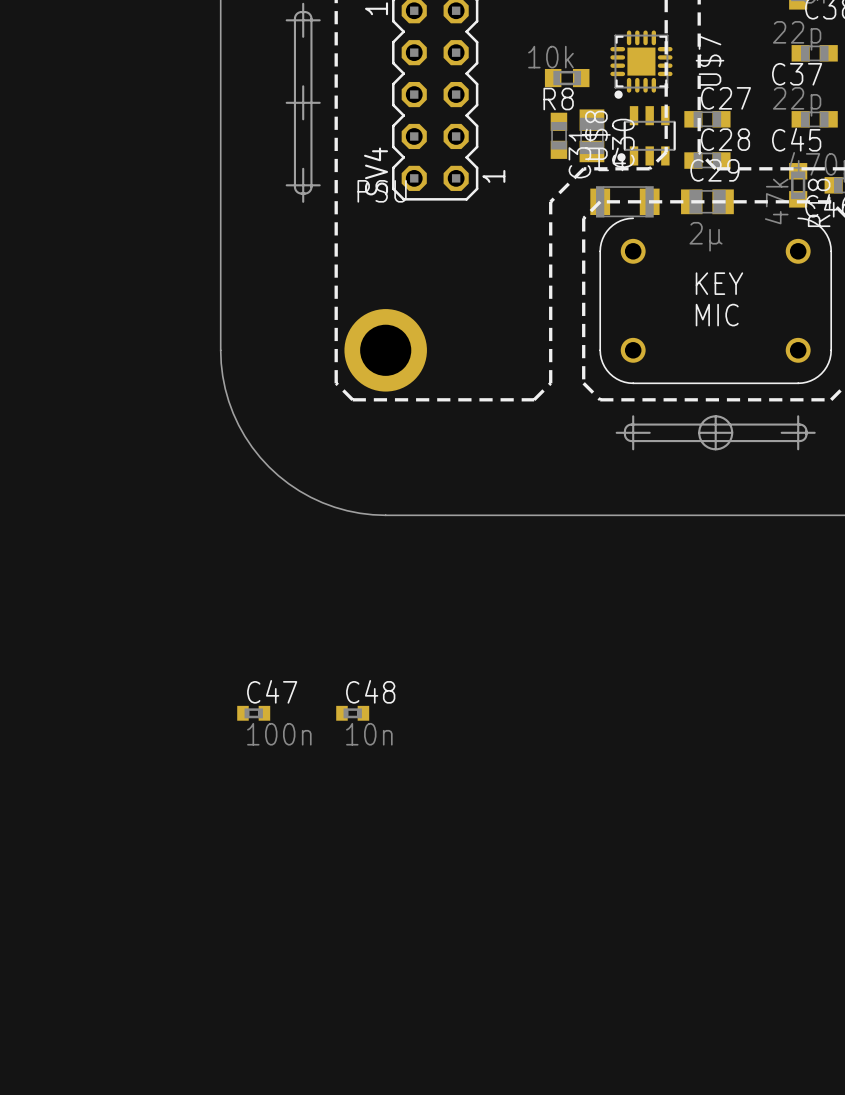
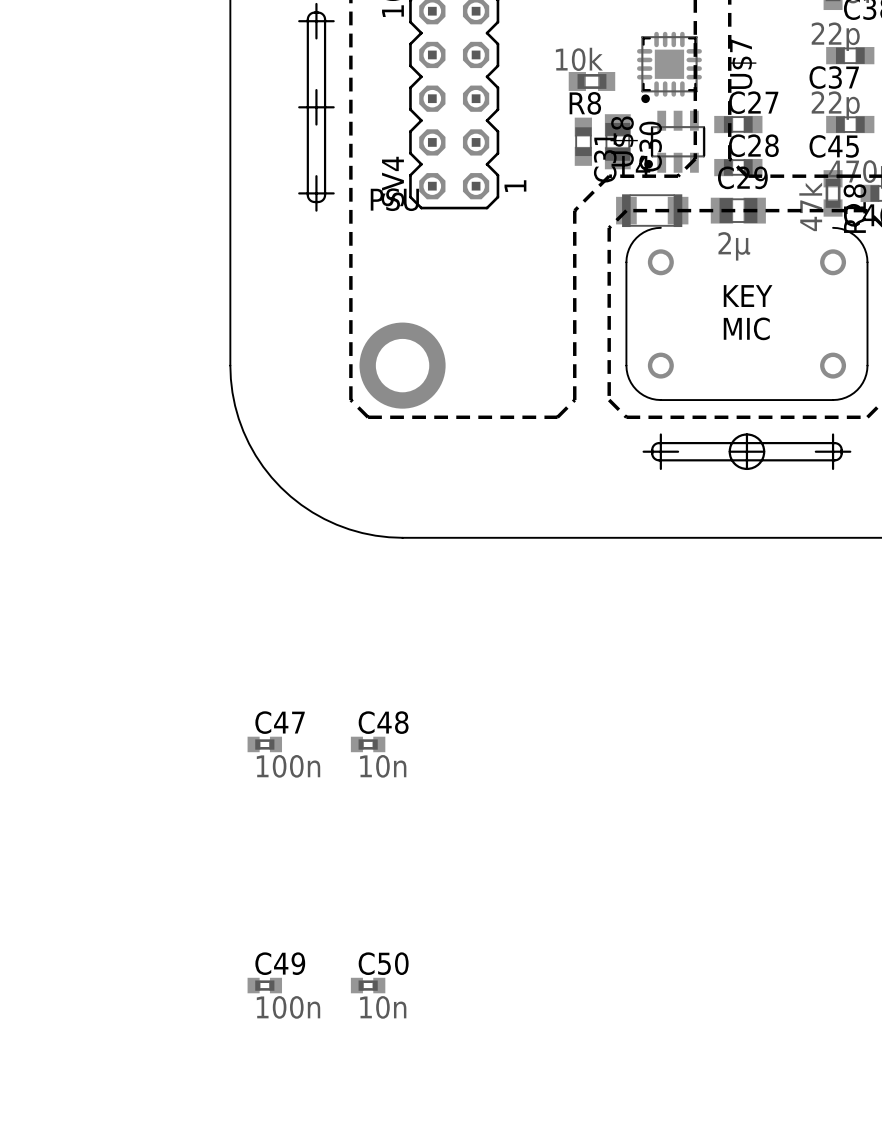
C49: none -> 100n (264, 985)
C50: none -> 10n (368, 985)

